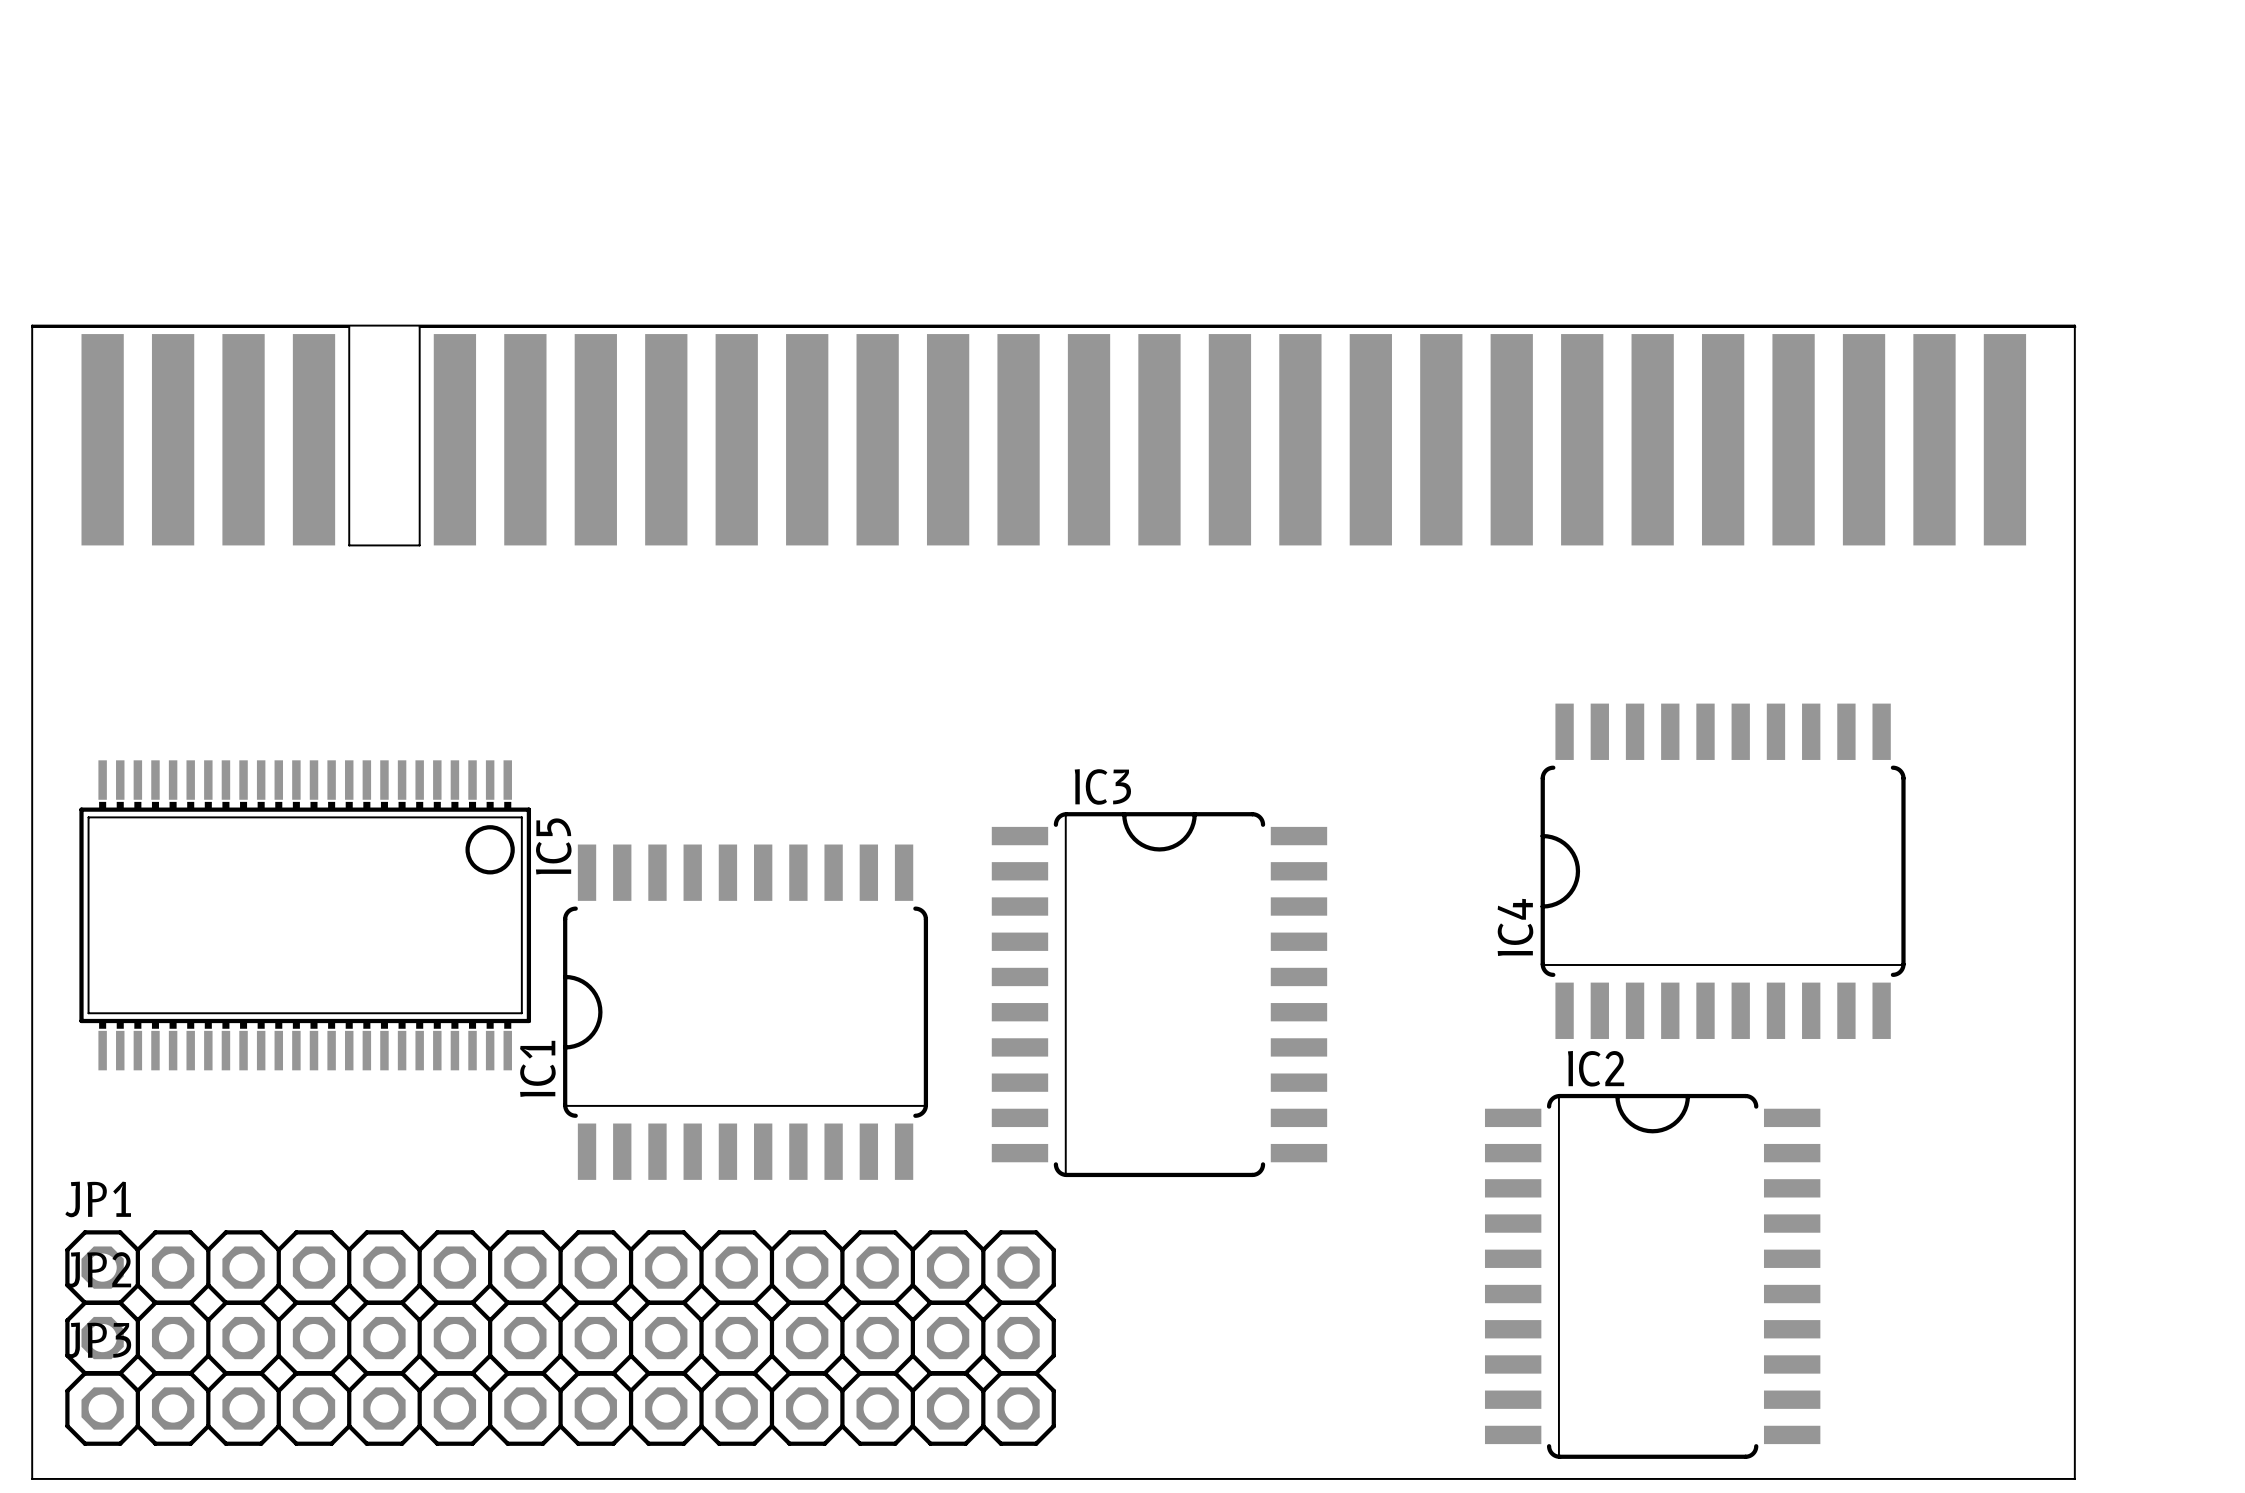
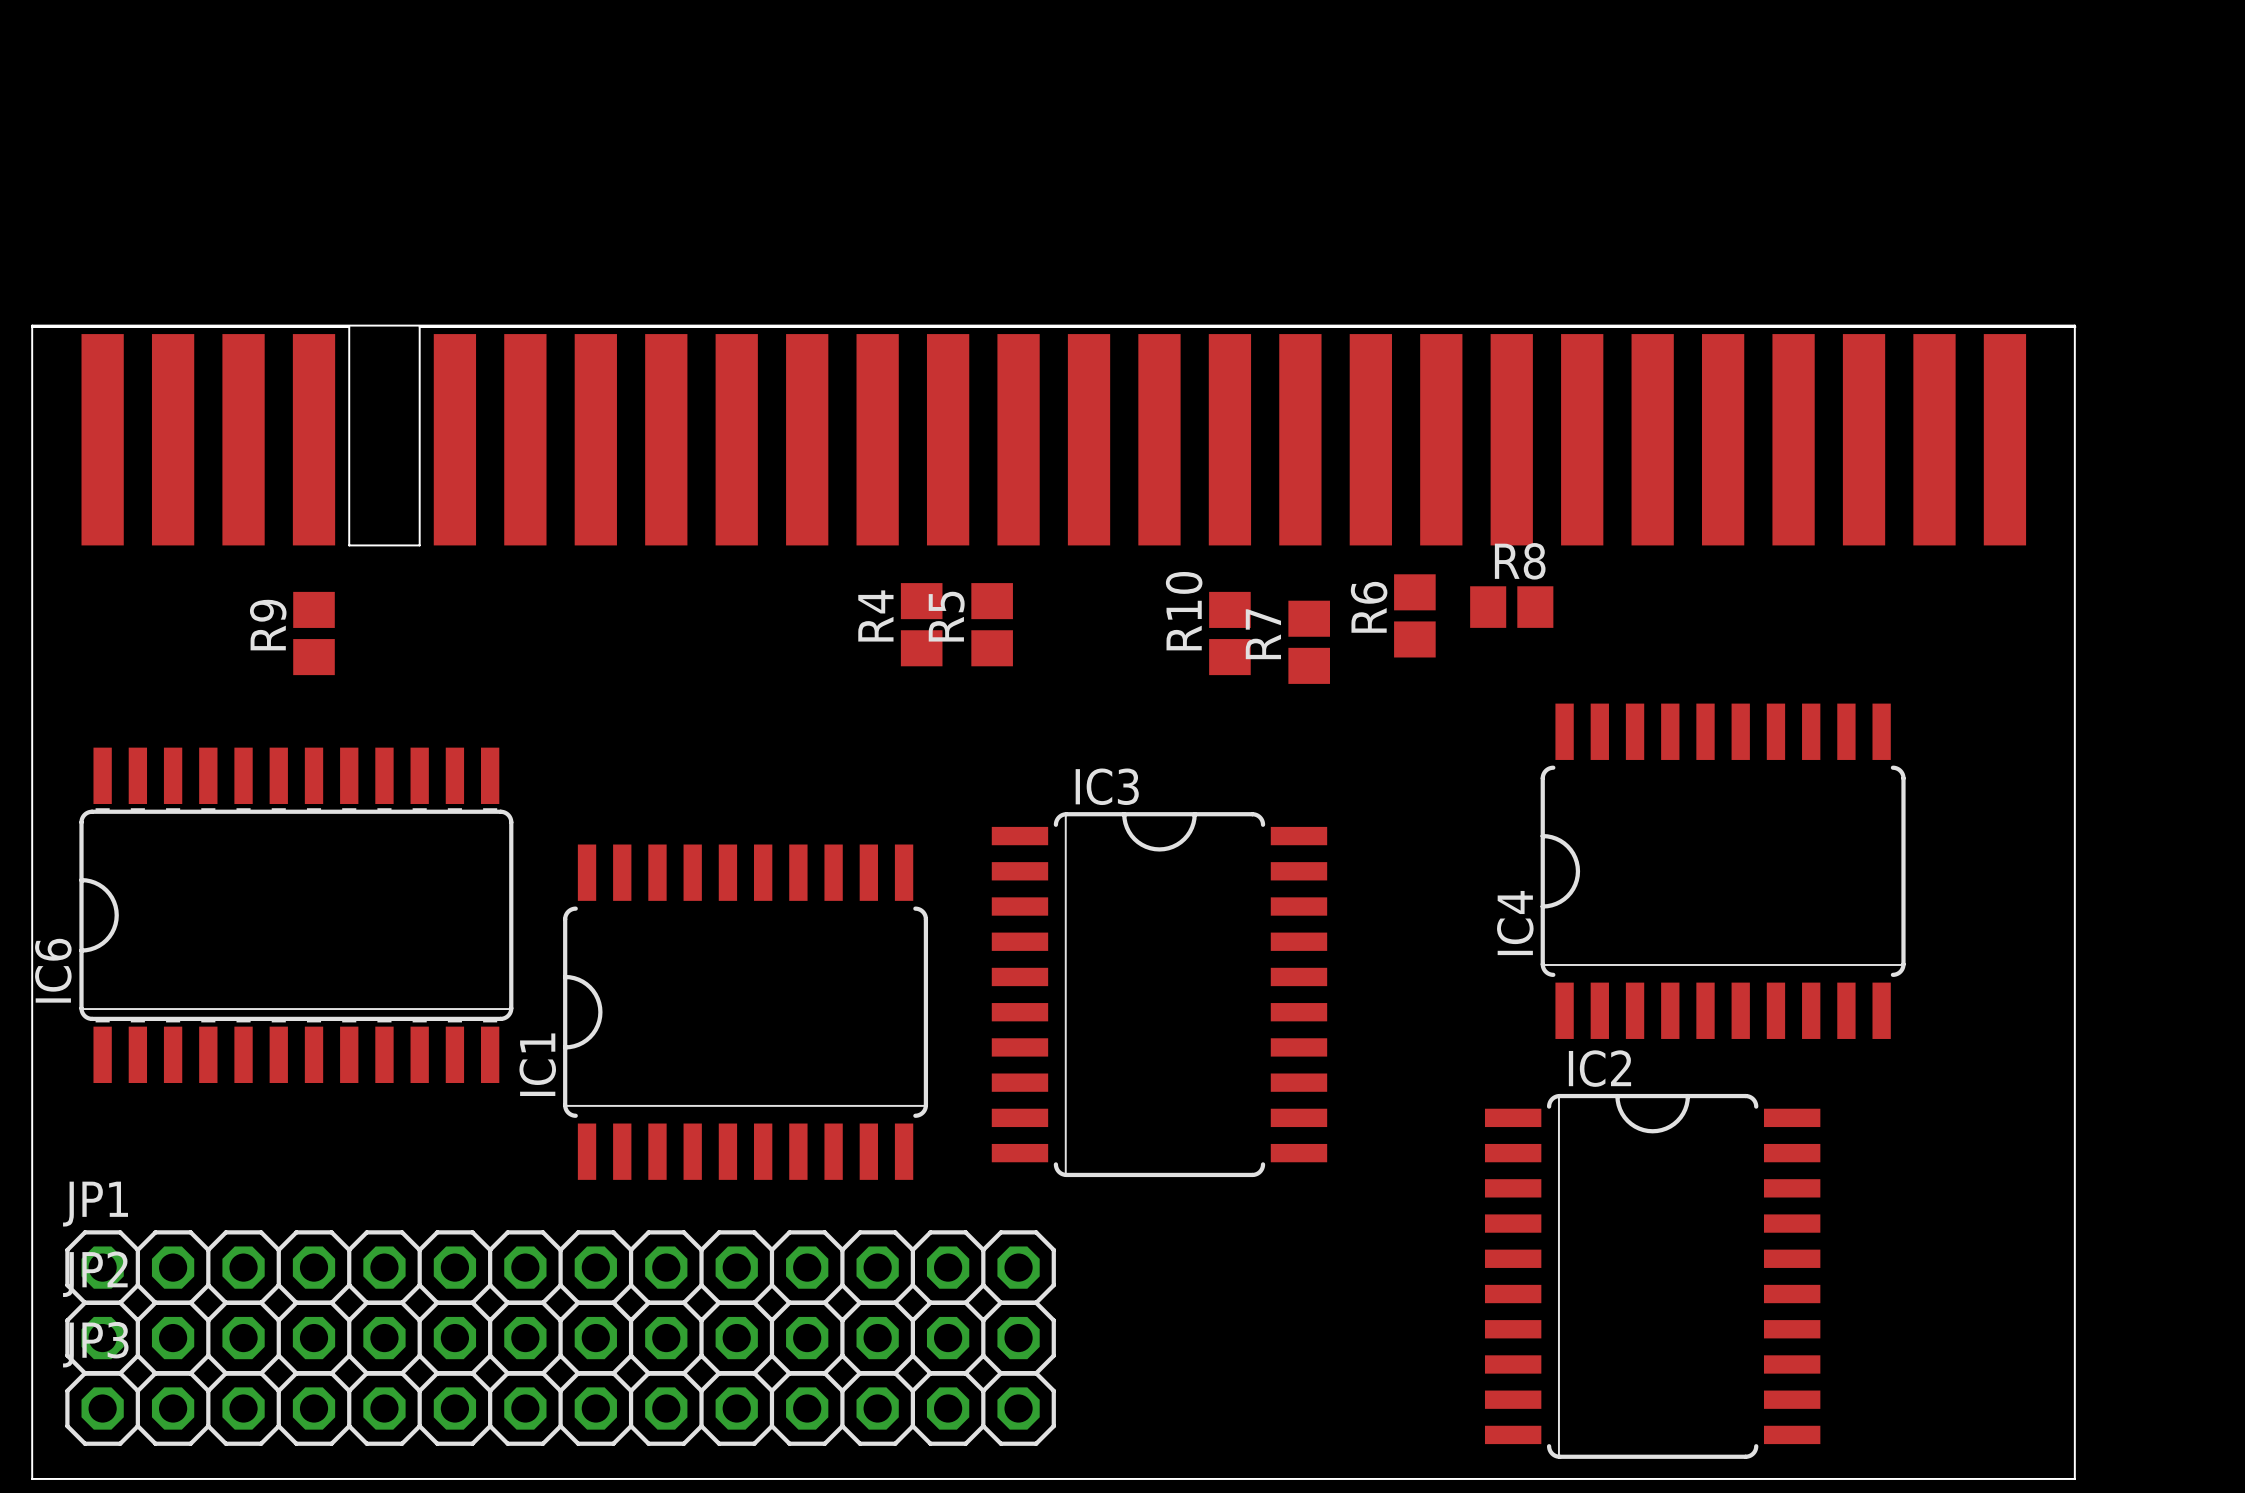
R8: none -> (1511, 607)
R6: none -> (1414, 615)
R4: none -> (921, 624)
R5: none -> (992, 624)
R9: none -> (314, 633)
R10: none -> (1229, 633)
R7: none -> (1309, 642)
IC6: none -> (296, 915)
IC5: (305, 915) -> none

